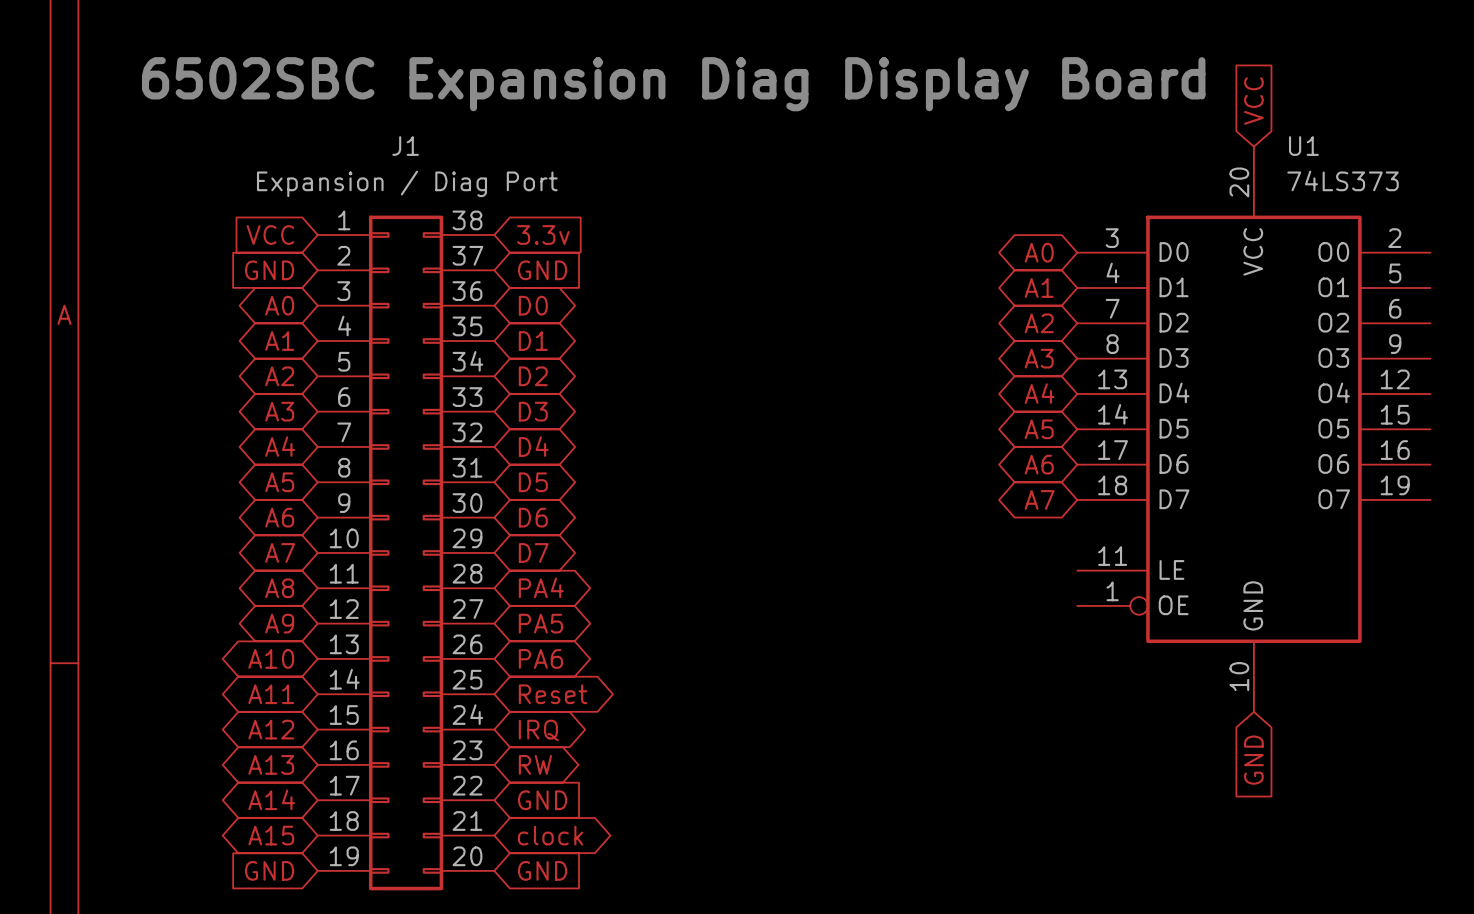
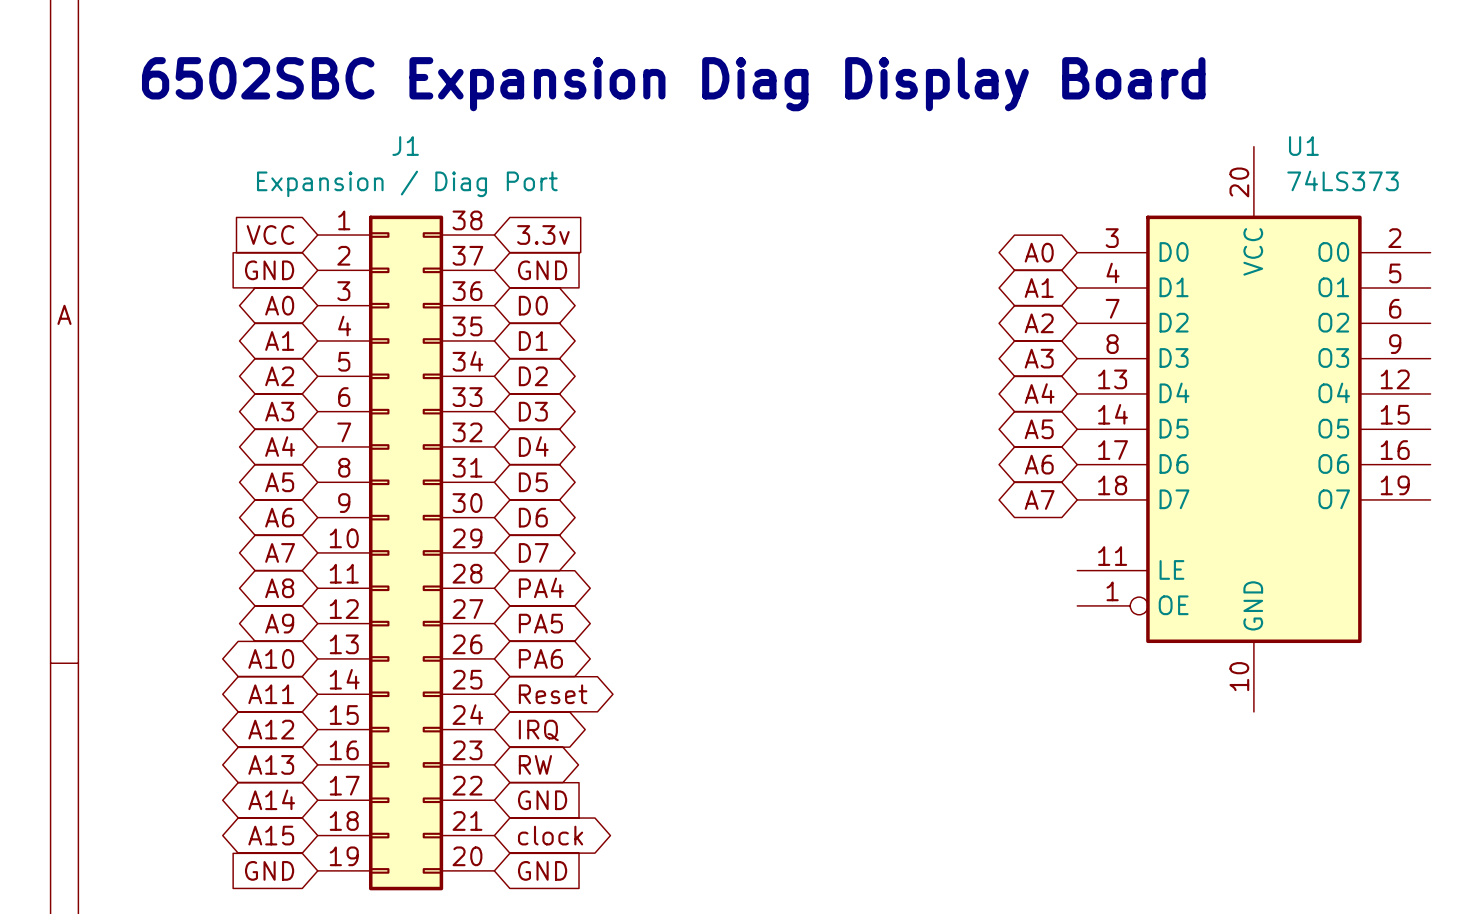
global label: VCC (1253, 101) -> none
global label: GND (1253, 760) -> none

